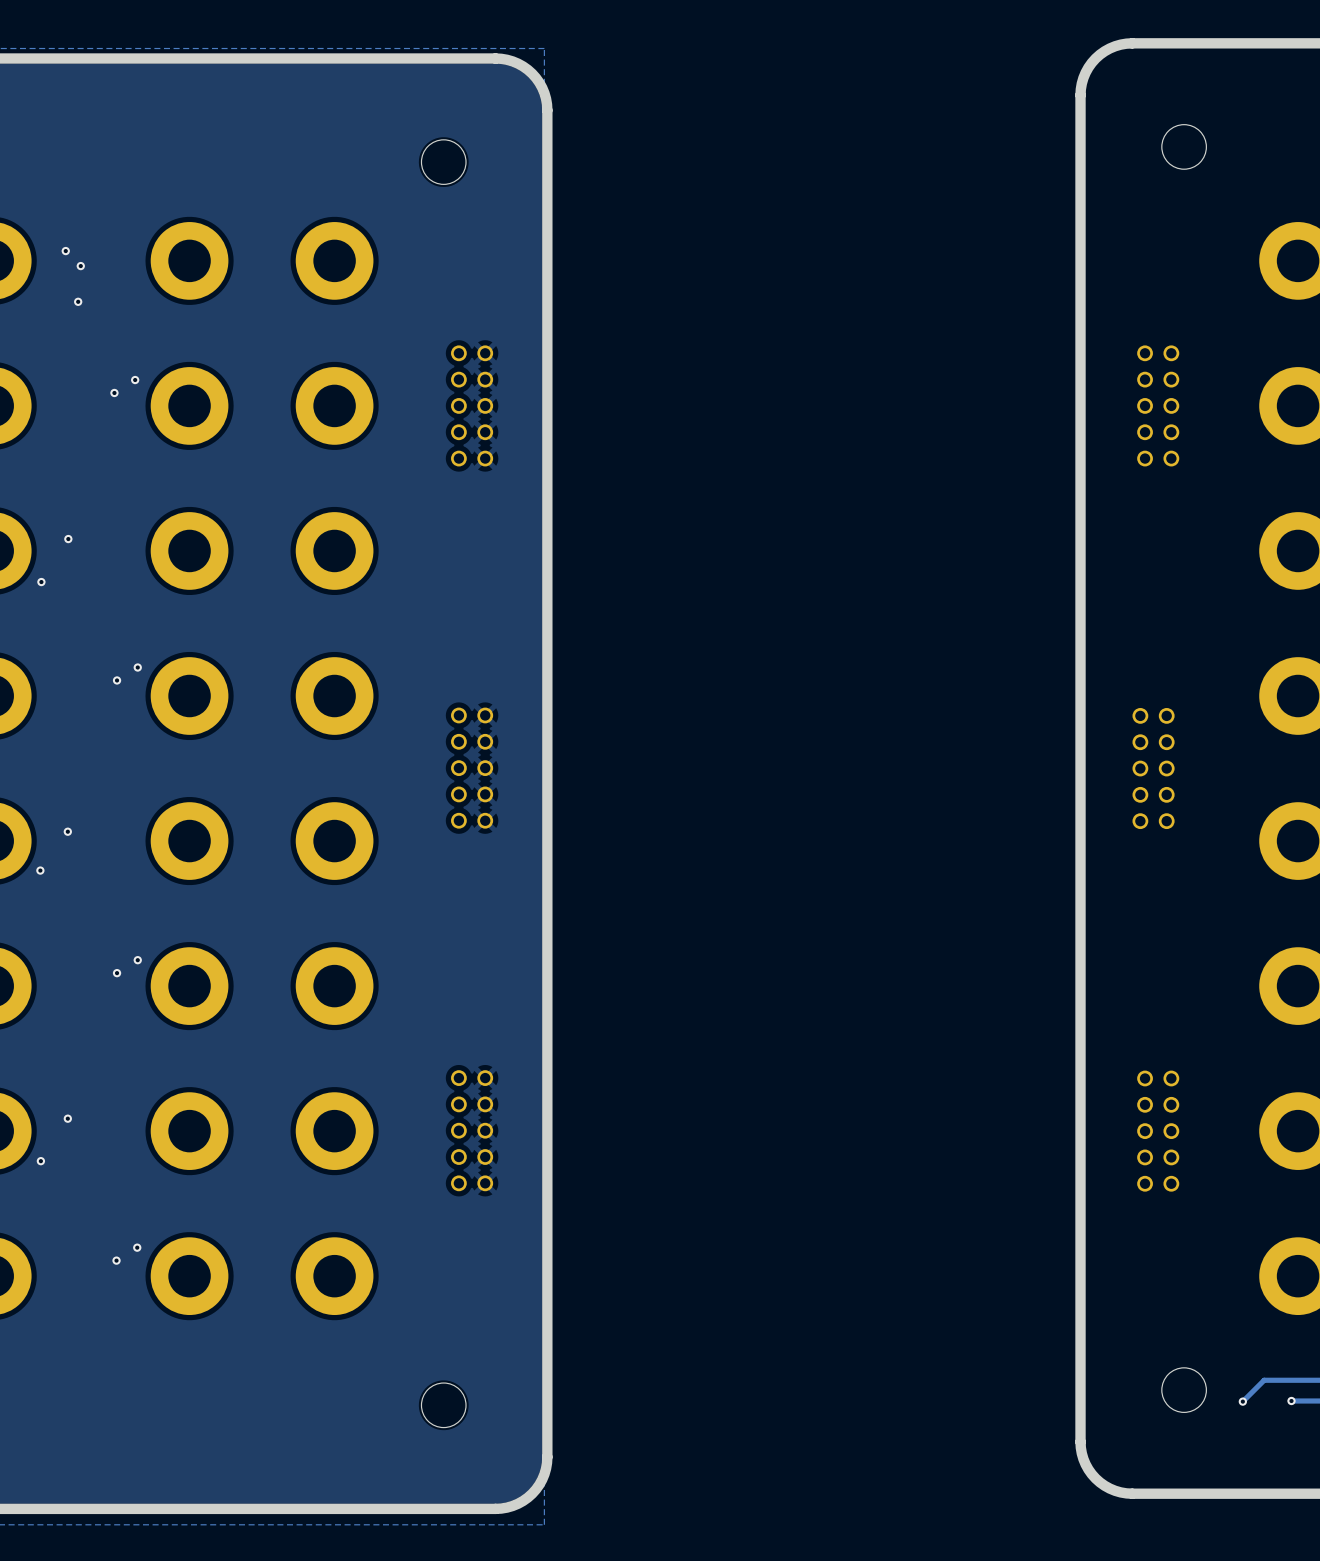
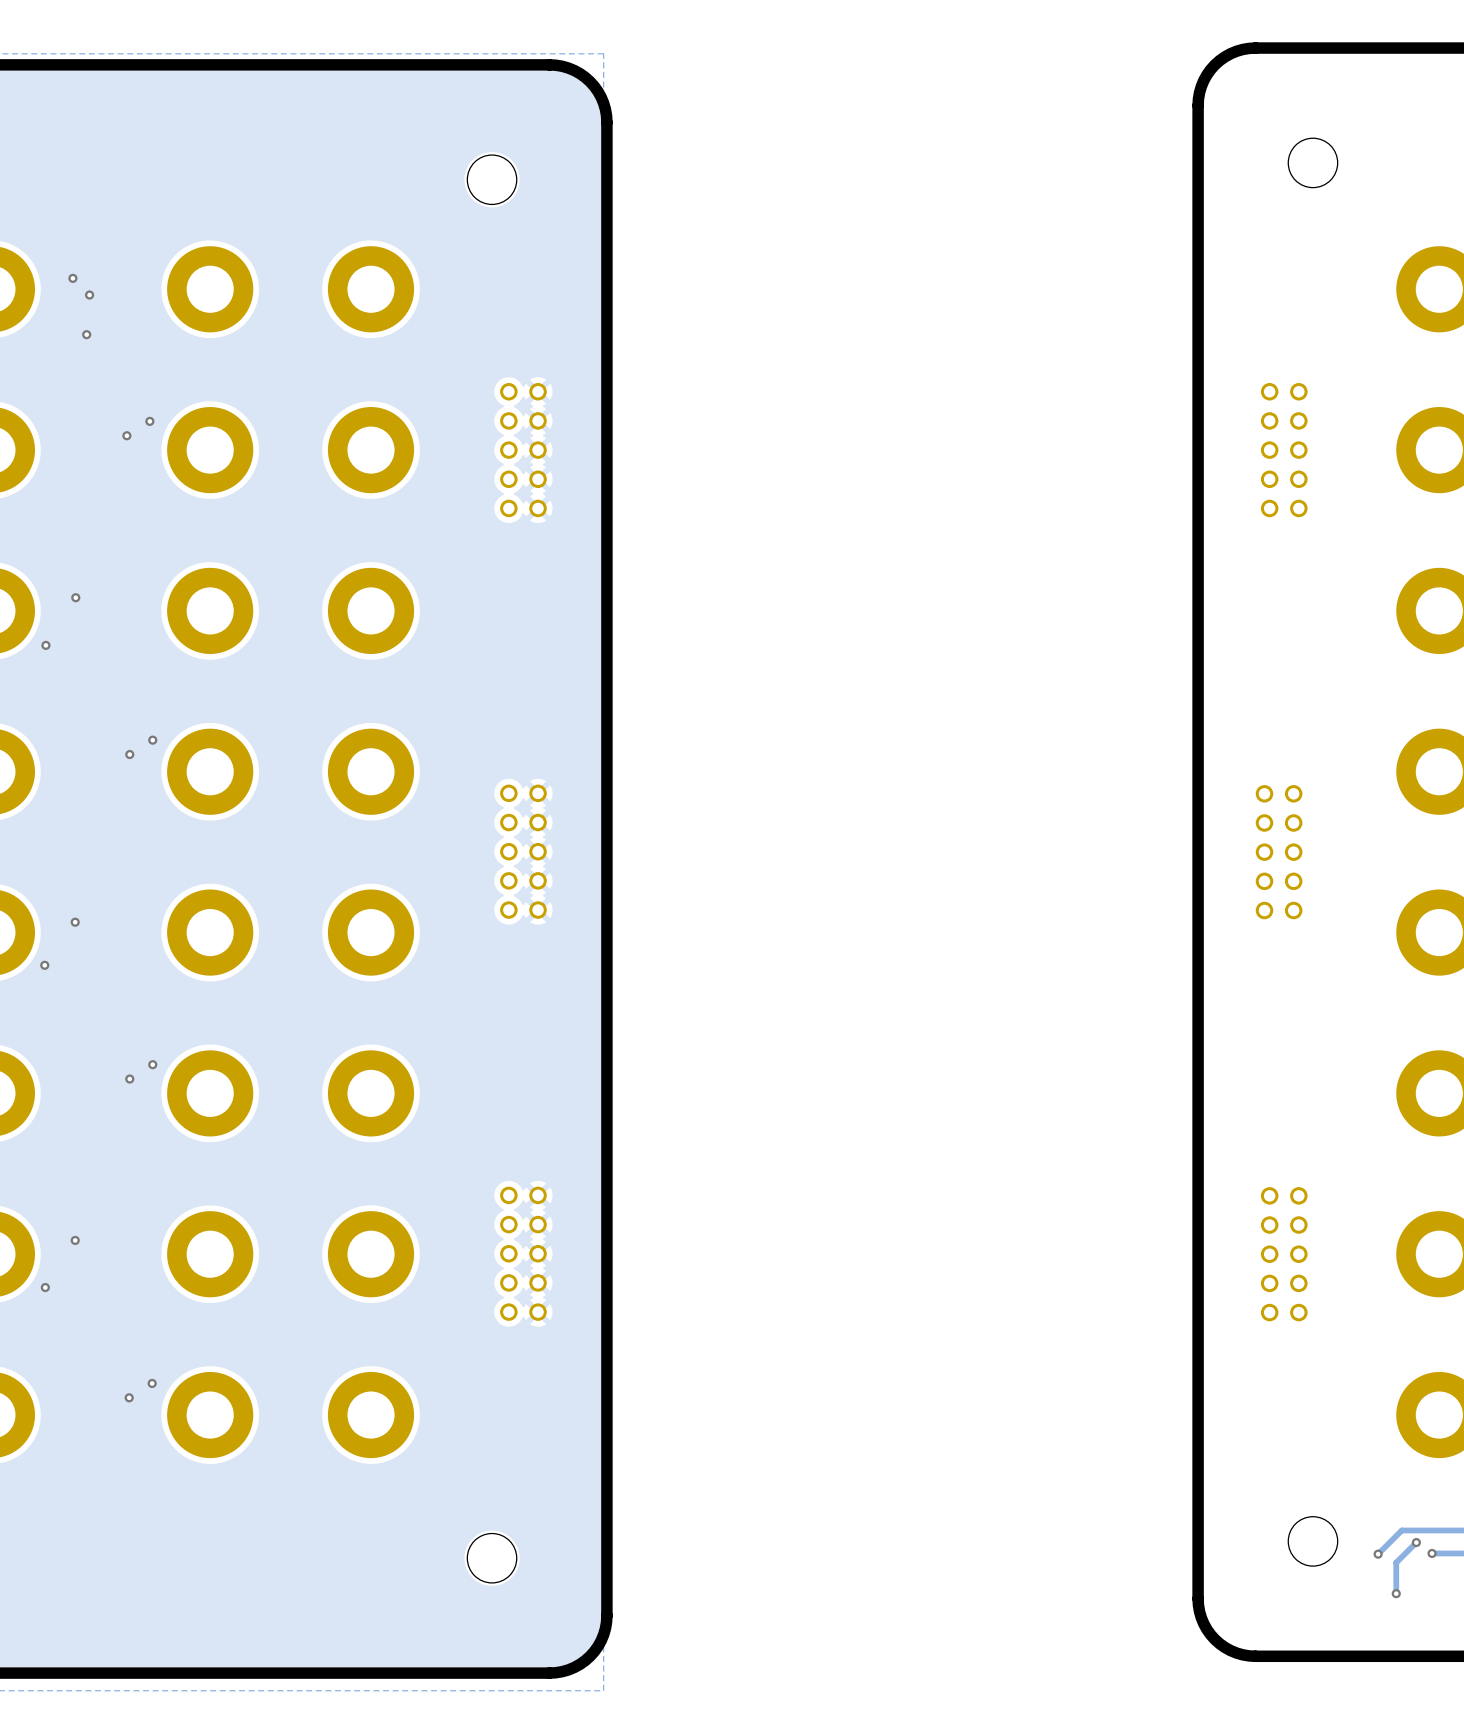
track: none -> (1416, 1542) (1396, 1562) (1396, 1593)
via: none -> (1416, 1542)
via: none -> (1396, 1593)

